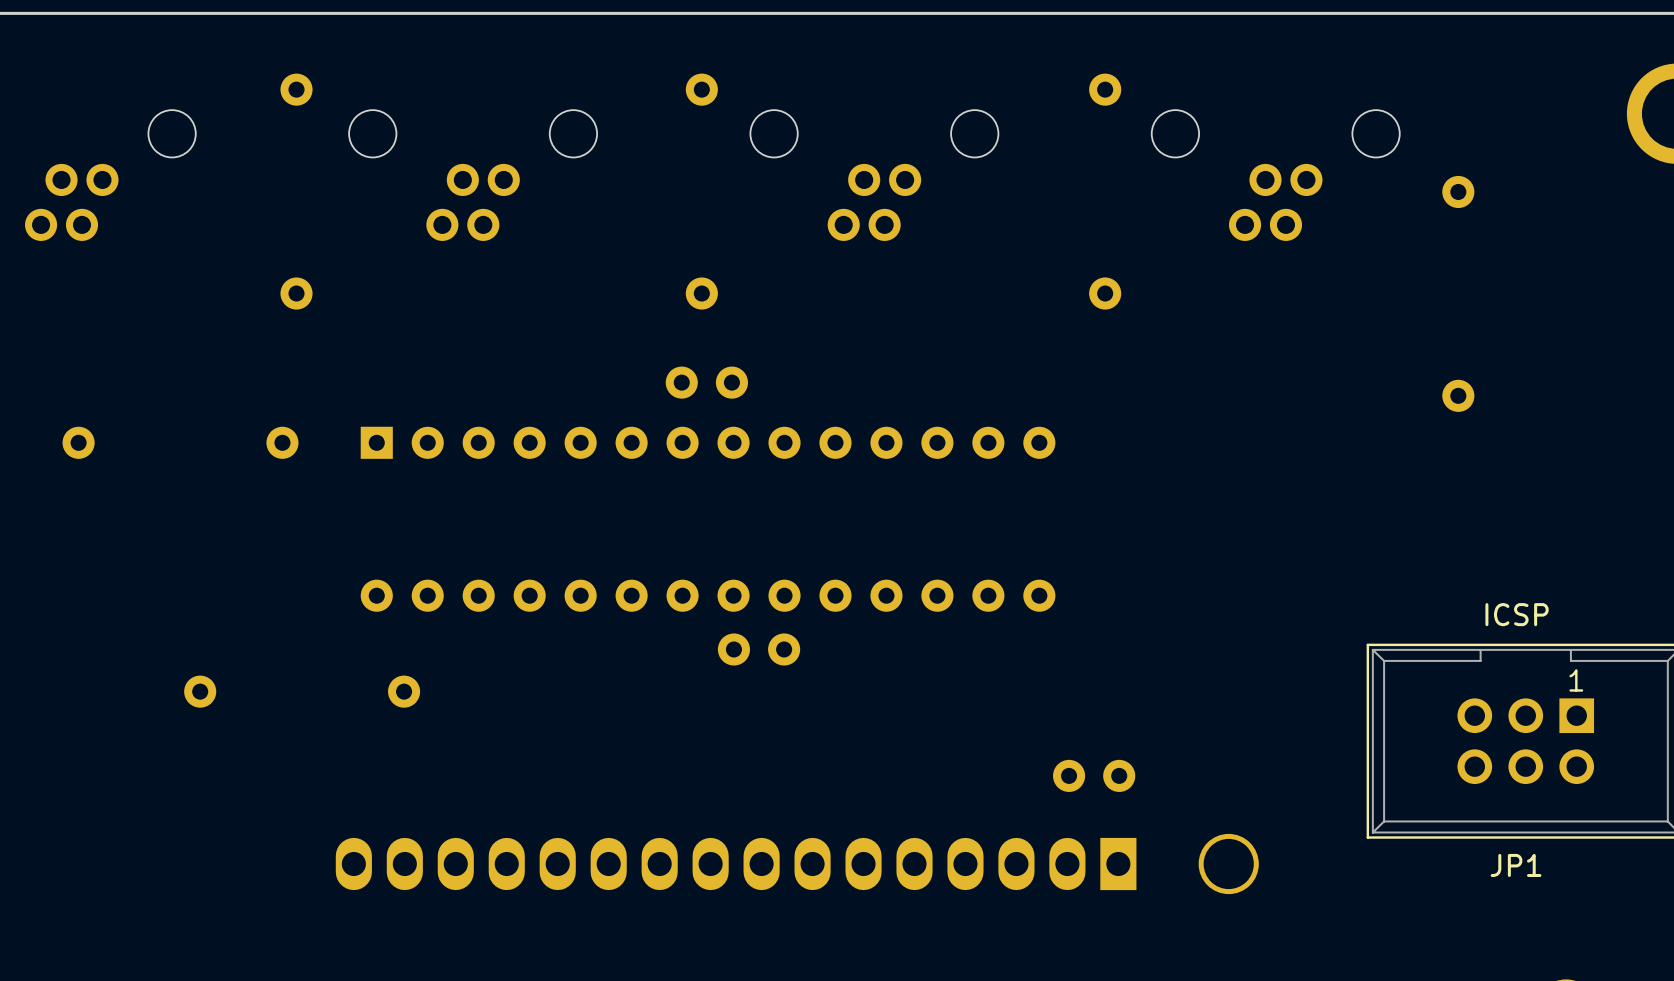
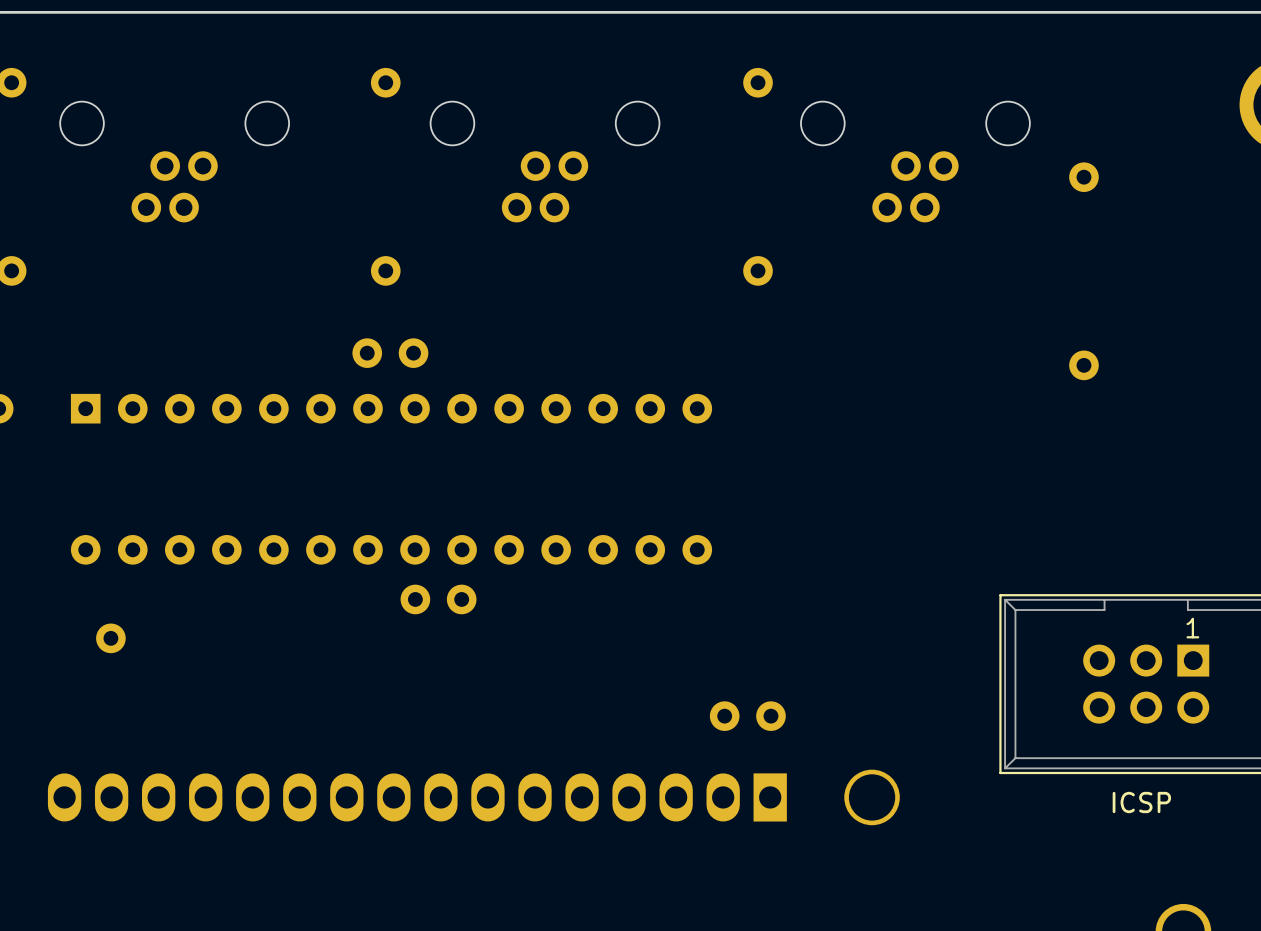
JP1 value position: ICSP (1517, 614) -> ICSP (1141, 802)
JP1 name: JP1 (1516, 865) -> none

